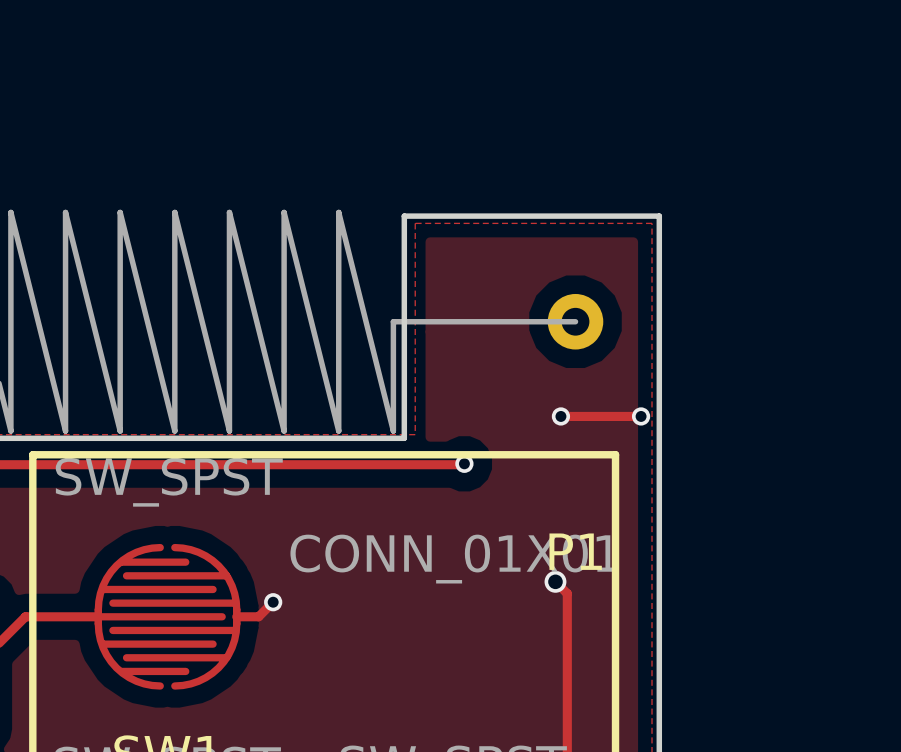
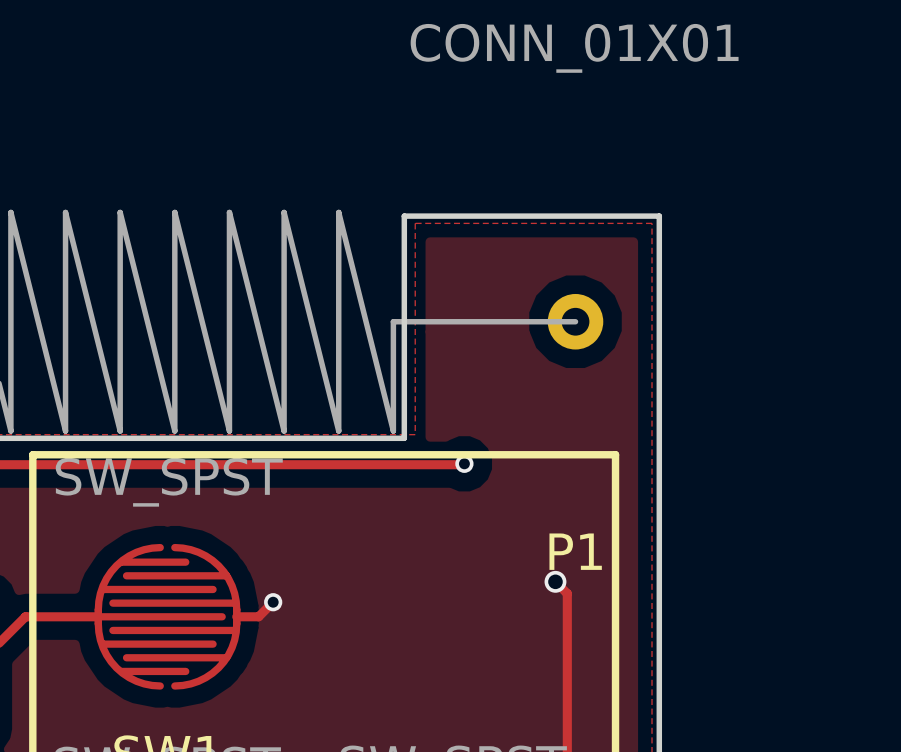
track: (560, 416) (641, 416) -> none
via: (560, 416) -> none
via: (641, 416) -> none
P1 value position: CONN_01X01 (454, 559) -> CONN_01X01 (574, 48)

